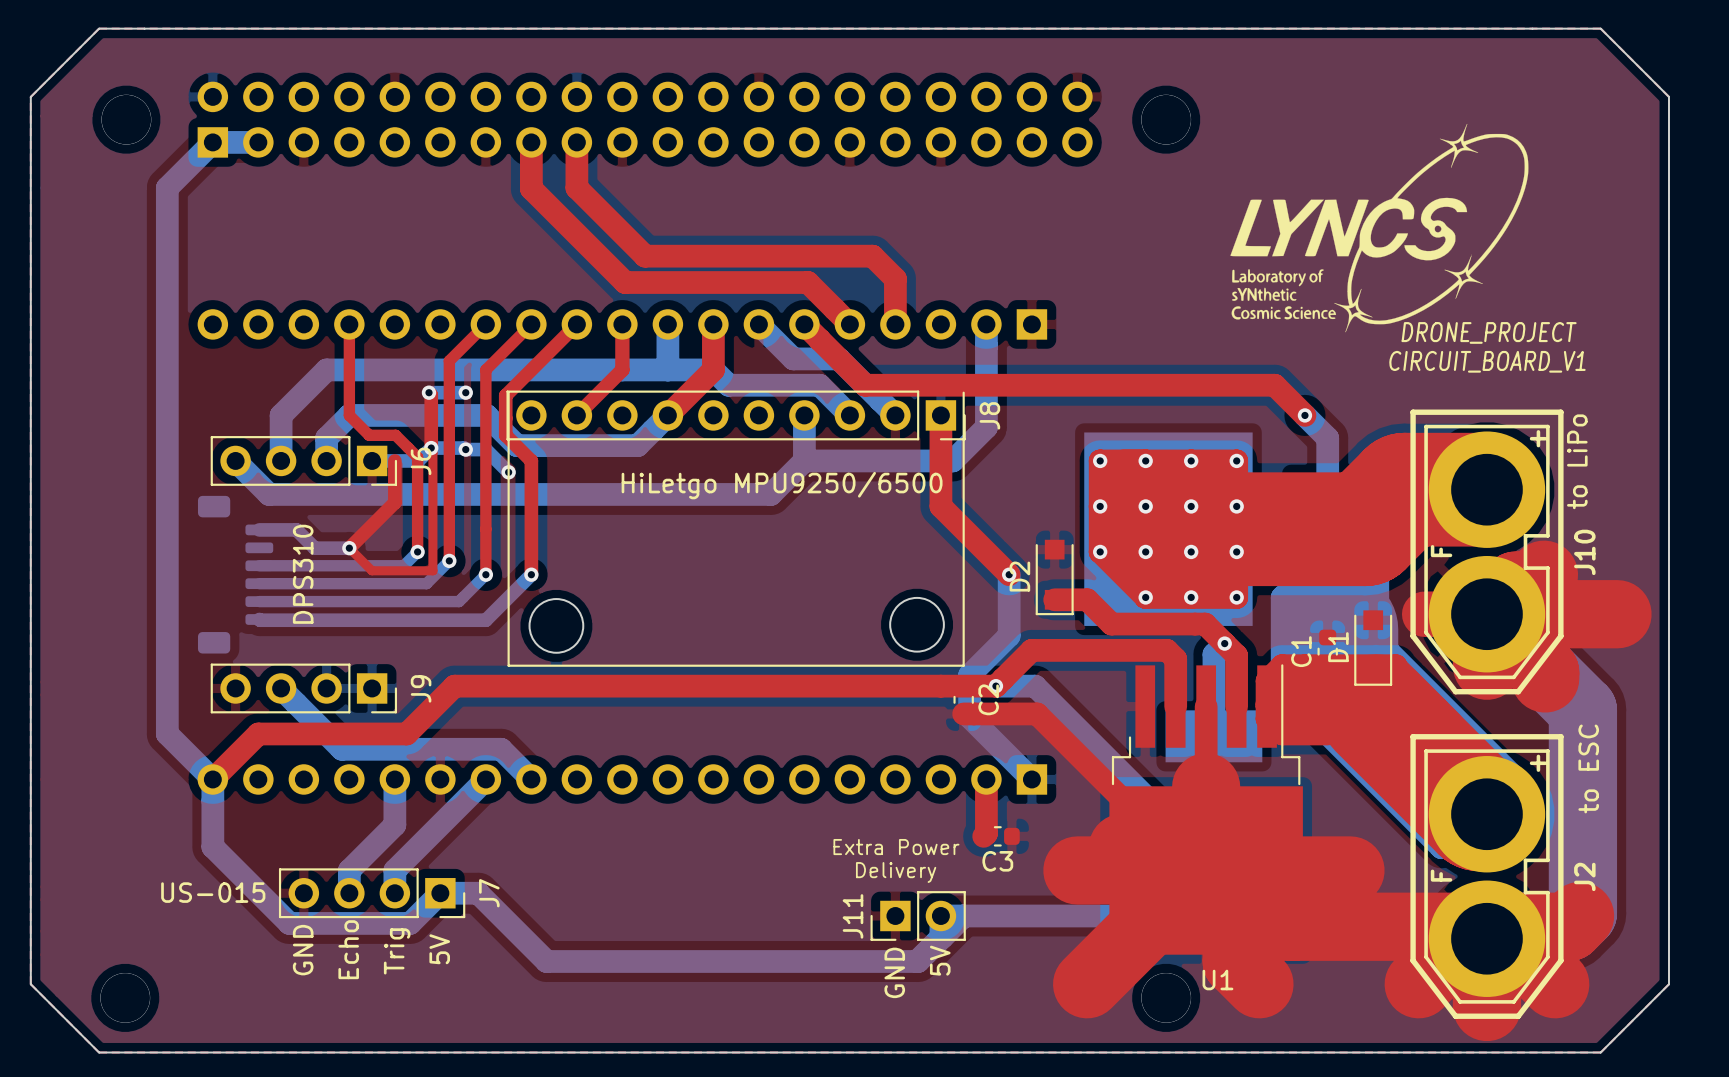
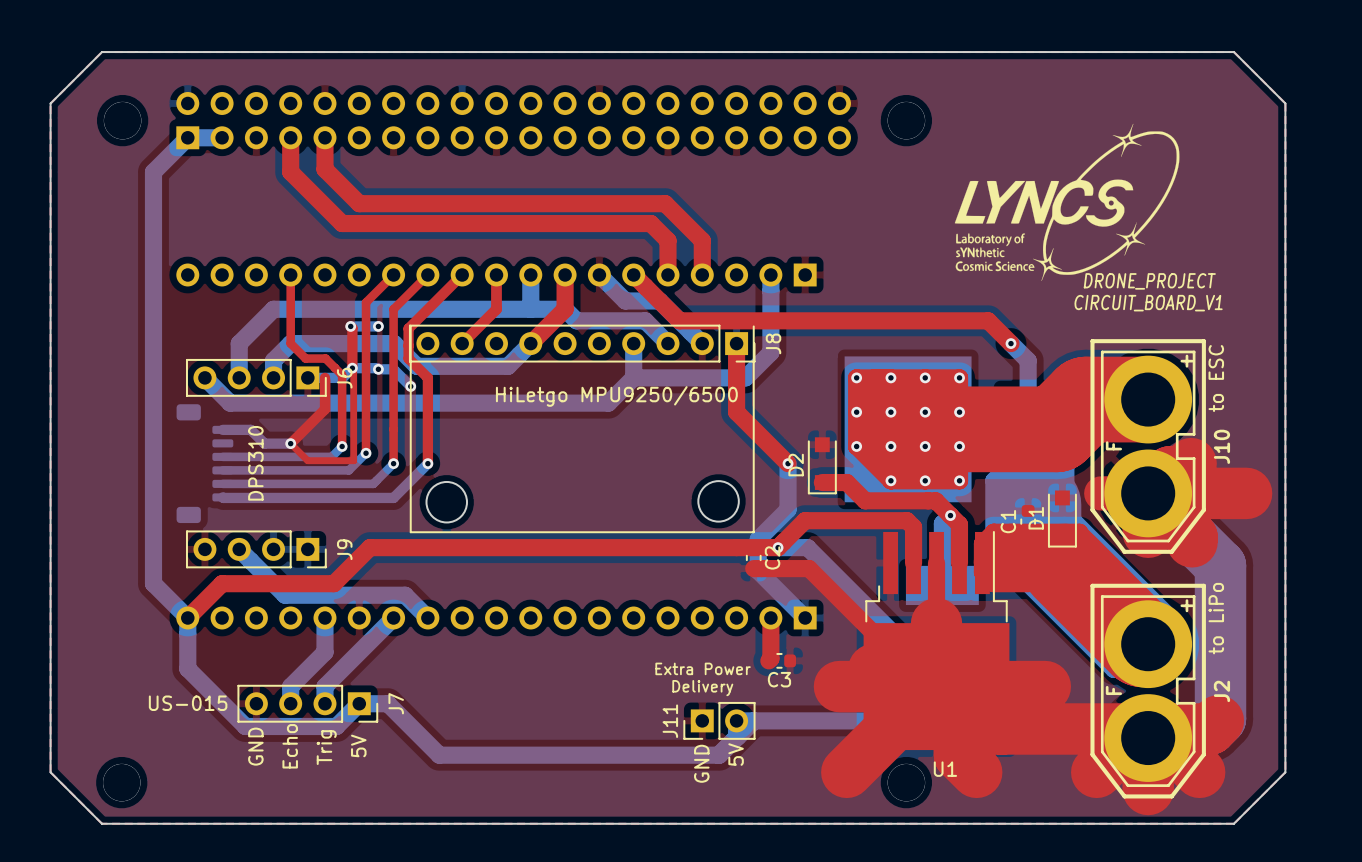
top track: none -> (324, 137) (324, 169) (359, 203) (665, 203) (685, 223)
top track: (531, 142) (531, 188) (625, 282) (807, 282) (849, 324) -> none
top track: (576, 142) (576, 187) (645, 256) -> (290, 137) (290, 172) (342, 223) (513, 223)
top track: (827, 256) (872, 256) -> (650, 223) (667, 240) (667, 274)
text: to LiPo (1577, 461) -> to ESC (1216, 378)
text: to ESC (1588, 768) -> to LiPo (1216, 618)

